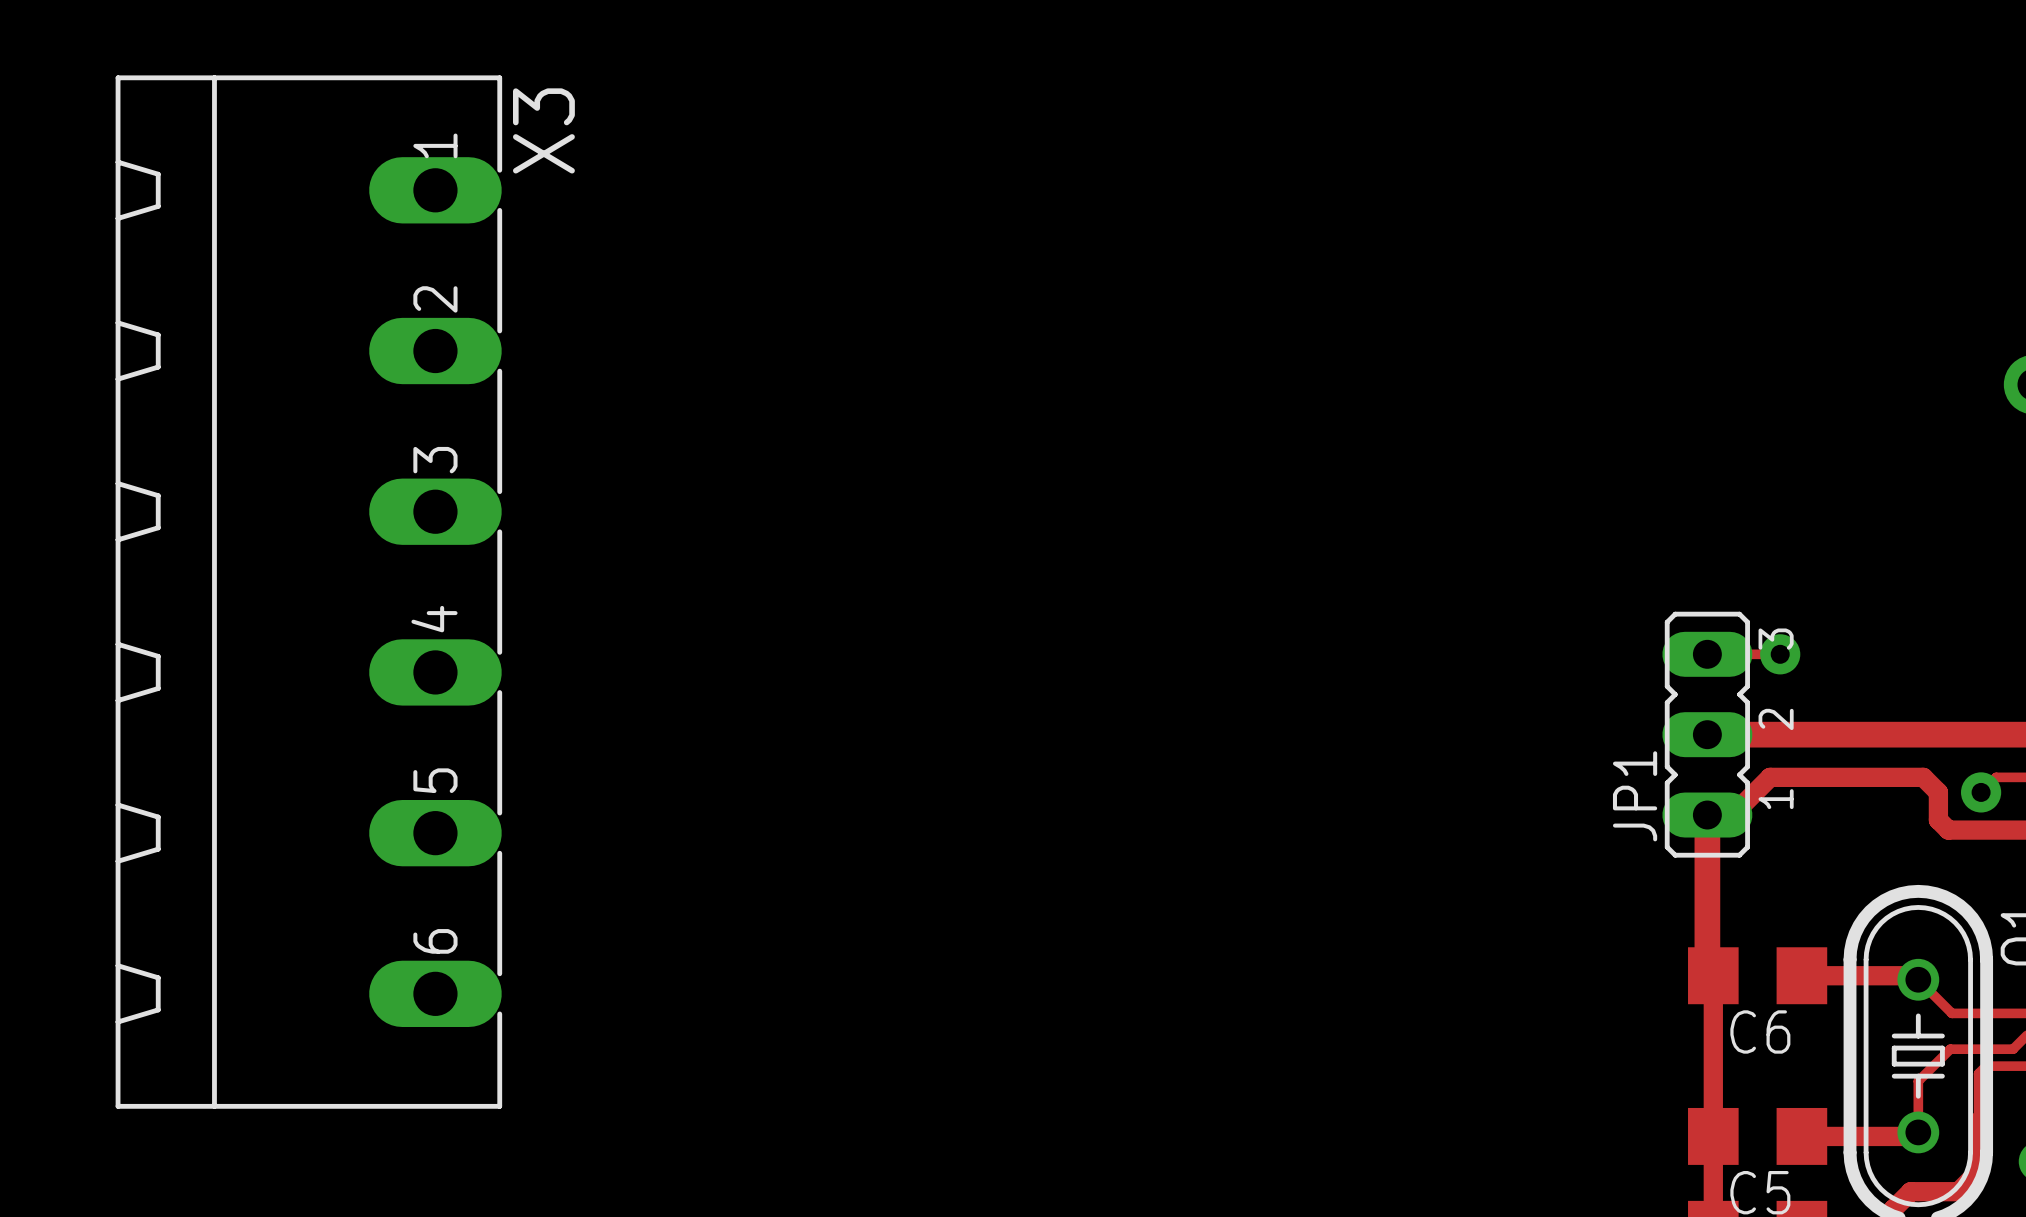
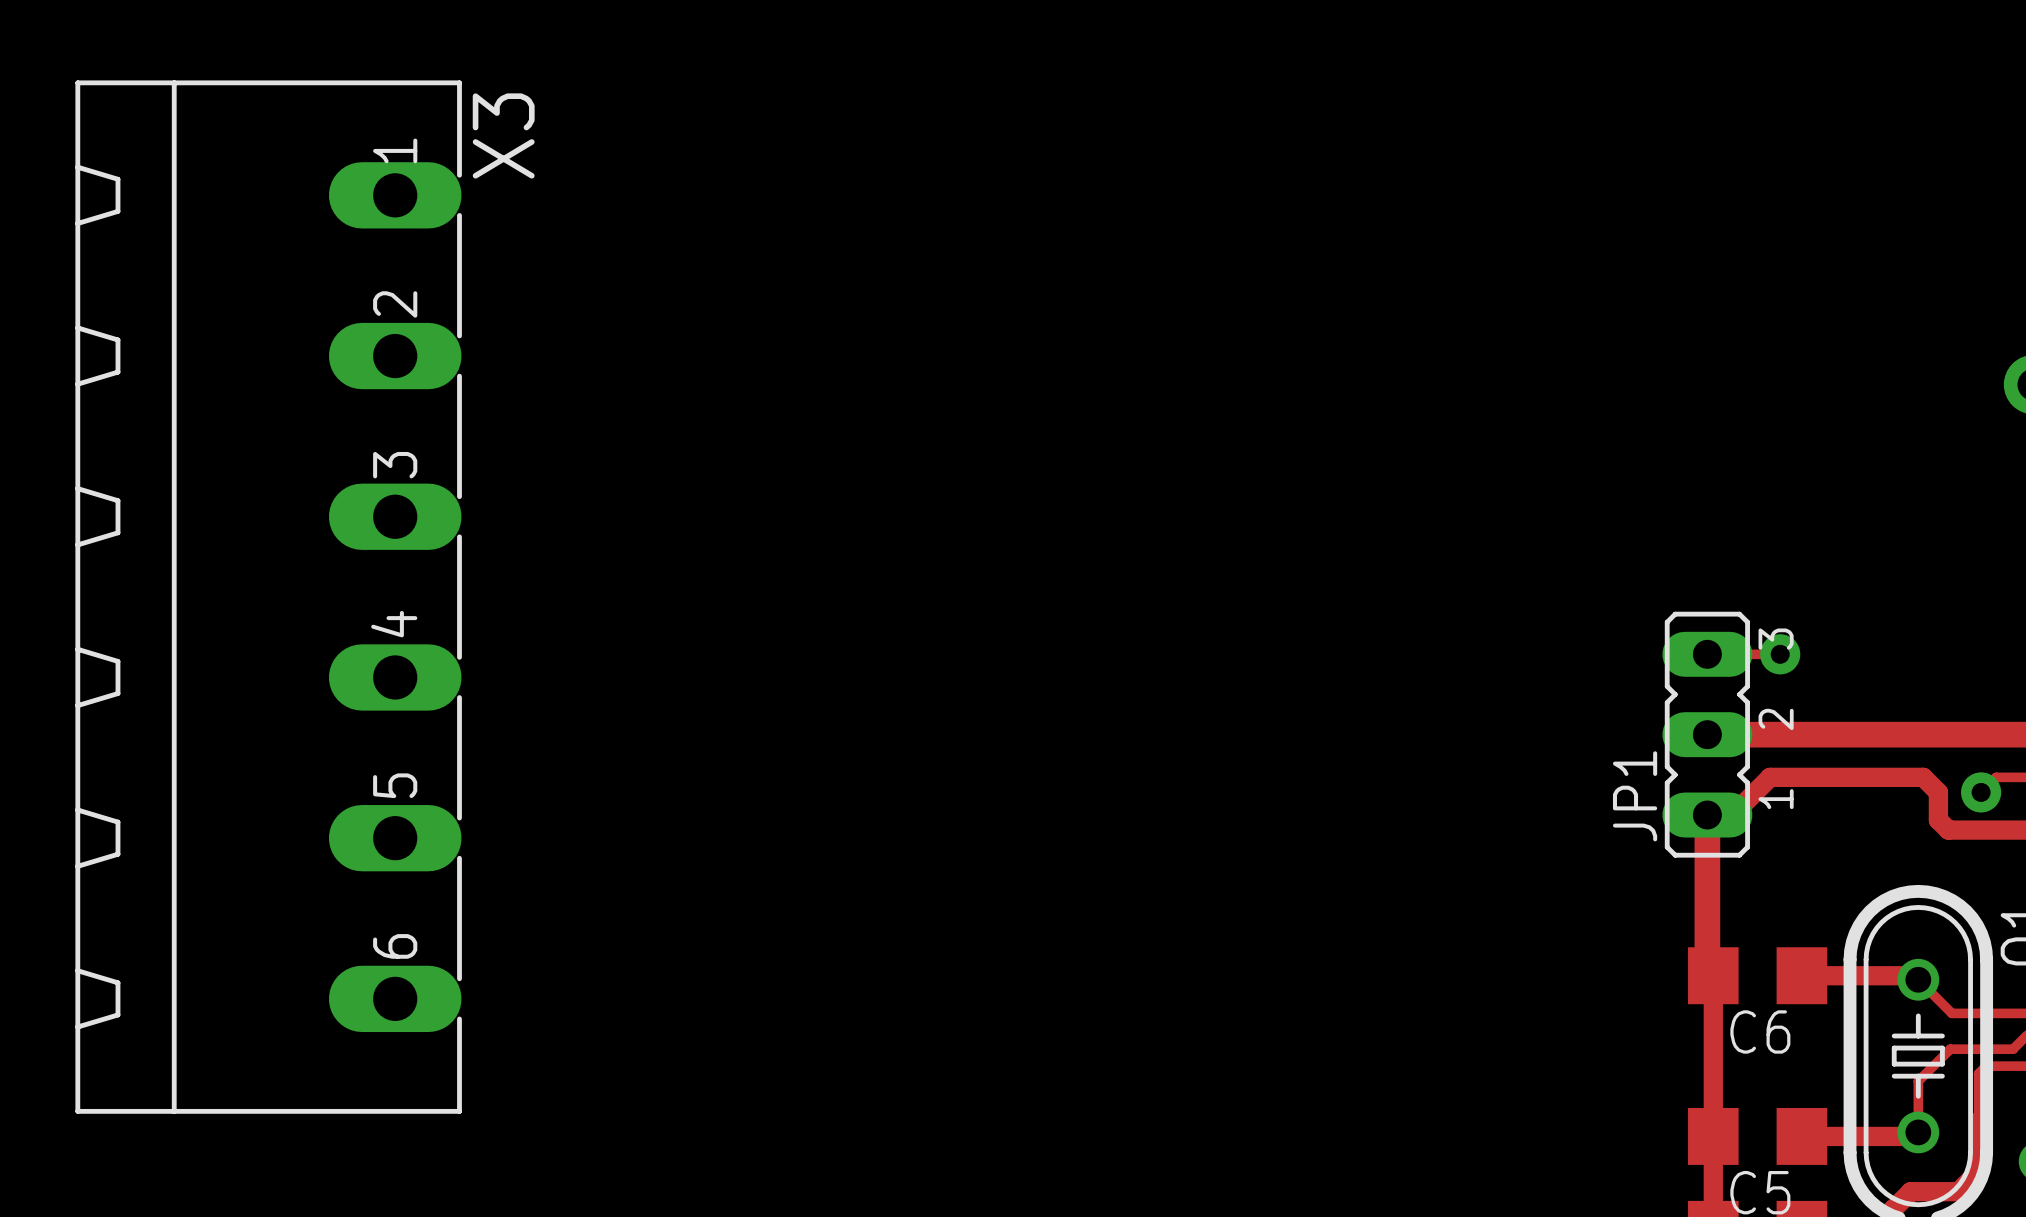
X3 position: (308, 592) -> (268, 597)

